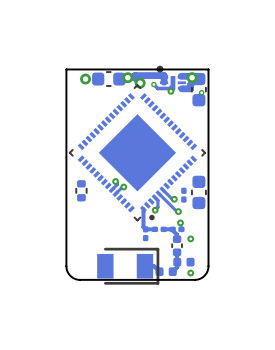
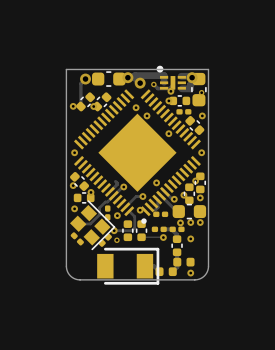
track: none -> (85, 79) (80, 83) (80, 106)
part footprint: [68, 84, 206, 222] -> [73, 89, 201, 224]
via: none -> (168, 100)
part: none -> (179, 100)
part: none -> (85, 101)
part: none -> (101, 101)
via: none -> (73, 106)
via: none -> (93, 106)
via: none -> (136, 107)
part: none -> (183, 111)
via: none -> (147, 115)
via: none -> (202, 115)
part: none -> (194, 125)
via: none -> (168, 133)
via: none -> (74, 152)
via: none -> (201, 152)
via: none -> (195, 180)
part: none -> (79, 181)
via: (115, 181) -> none
via: none -> (156, 182)
part: none -> (200, 182)
via: none -> (73, 185)
part: (81, 190) -> none
via: none -> (90, 192)
part rotation: 0° (198, 192) -> 90° clockwise (189, 211)
part position: (198, 192) -> (189, 211)
part: none -> (189, 193)
track: none -> (113, 195) (99, 207) (99, 214) (90, 223) (78, 223)
part rotation: 0° (183, 195) -> 90° clockwise (160, 214)
part position: (183, 195) -> (160, 214)
via: none -> (183, 195)
track: none -> (142, 196) (136, 196) (125, 207)
via: none -> (142, 196)
part: none -> (84, 197)
via: none -> (200, 197)
via: none -> (74, 208)
track: (143, 209) (143, 227) (145, 229) (154, 229) -> none
via: none -> (140, 210)
via: (155, 210) -> none
track: none -> (129, 211) (134, 216) (134, 227) (131, 230) (114, 230)
via: (178, 211) -> none
part: none -> (107, 212)
via: none -> (117, 215)
via: none -> (190, 222)
via: none -> (200, 222)
part: none -> (92, 225)
part footprint: [142, 226, 149, 242] -> [135, 220, 148, 242]
via: none -> (114, 230)
part: none -> (127, 230)
track: none -> (141, 237) (163, 237)
via: none -> (163, 237)
part: none -> (77, 238)
part: none -> (105, 240)
via: none -> (116, 240)

